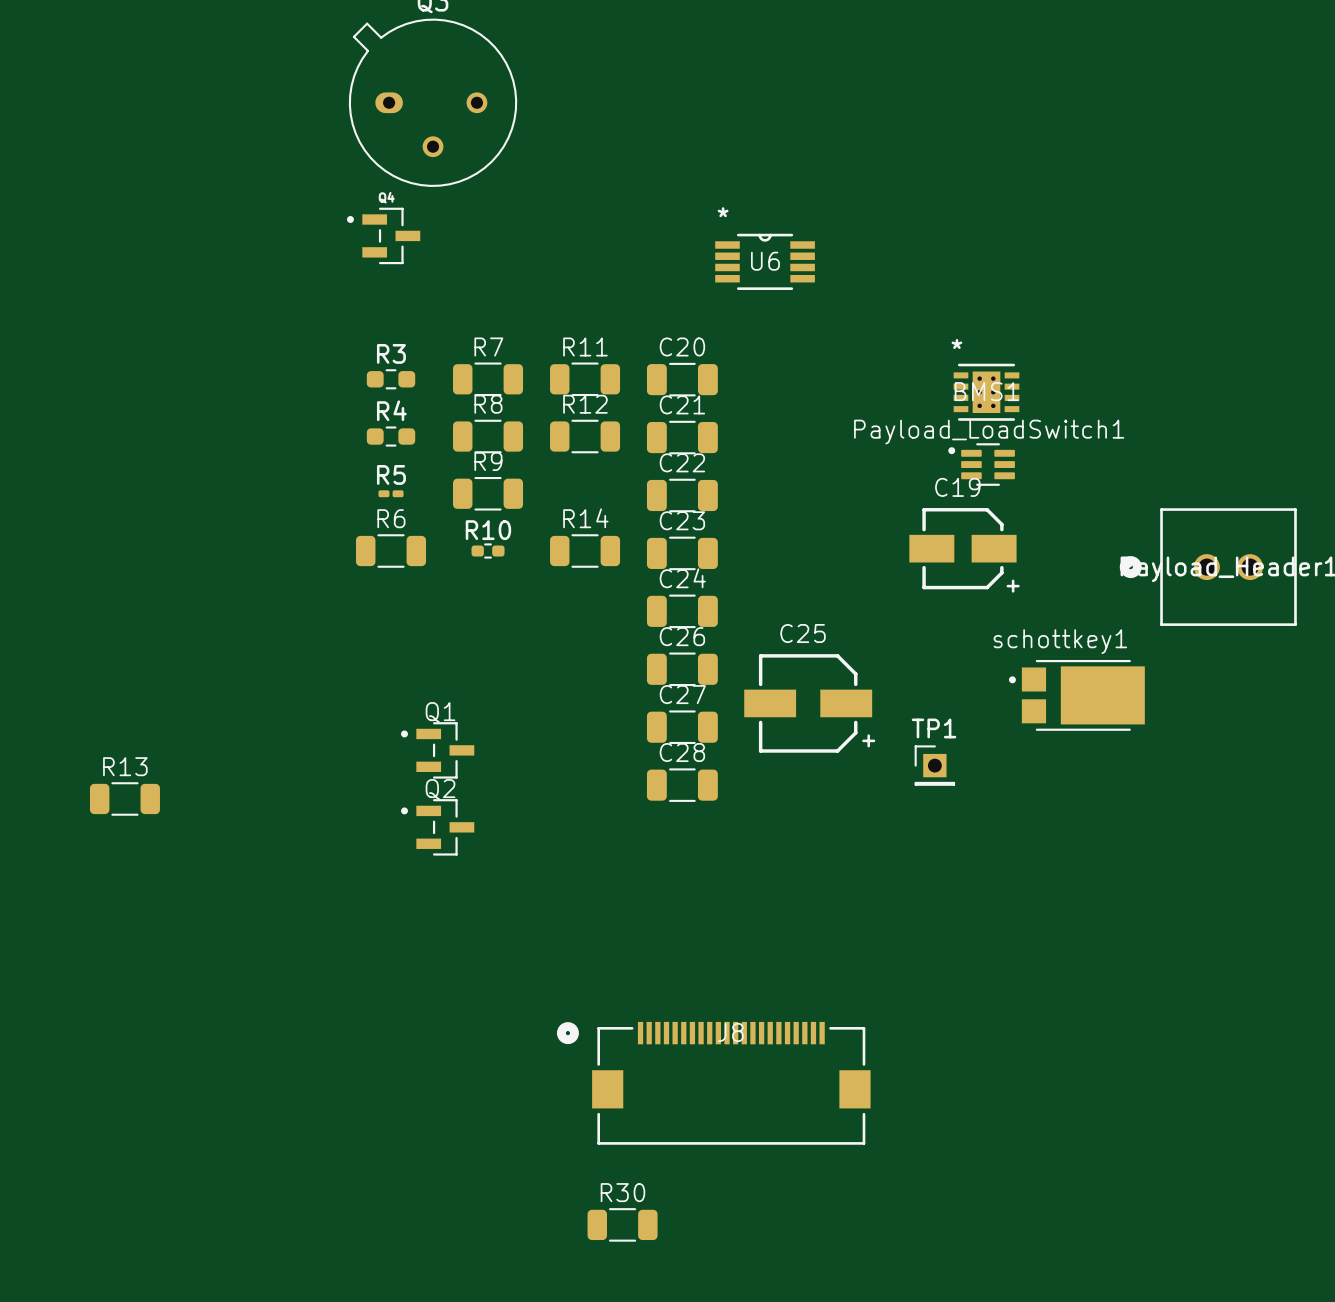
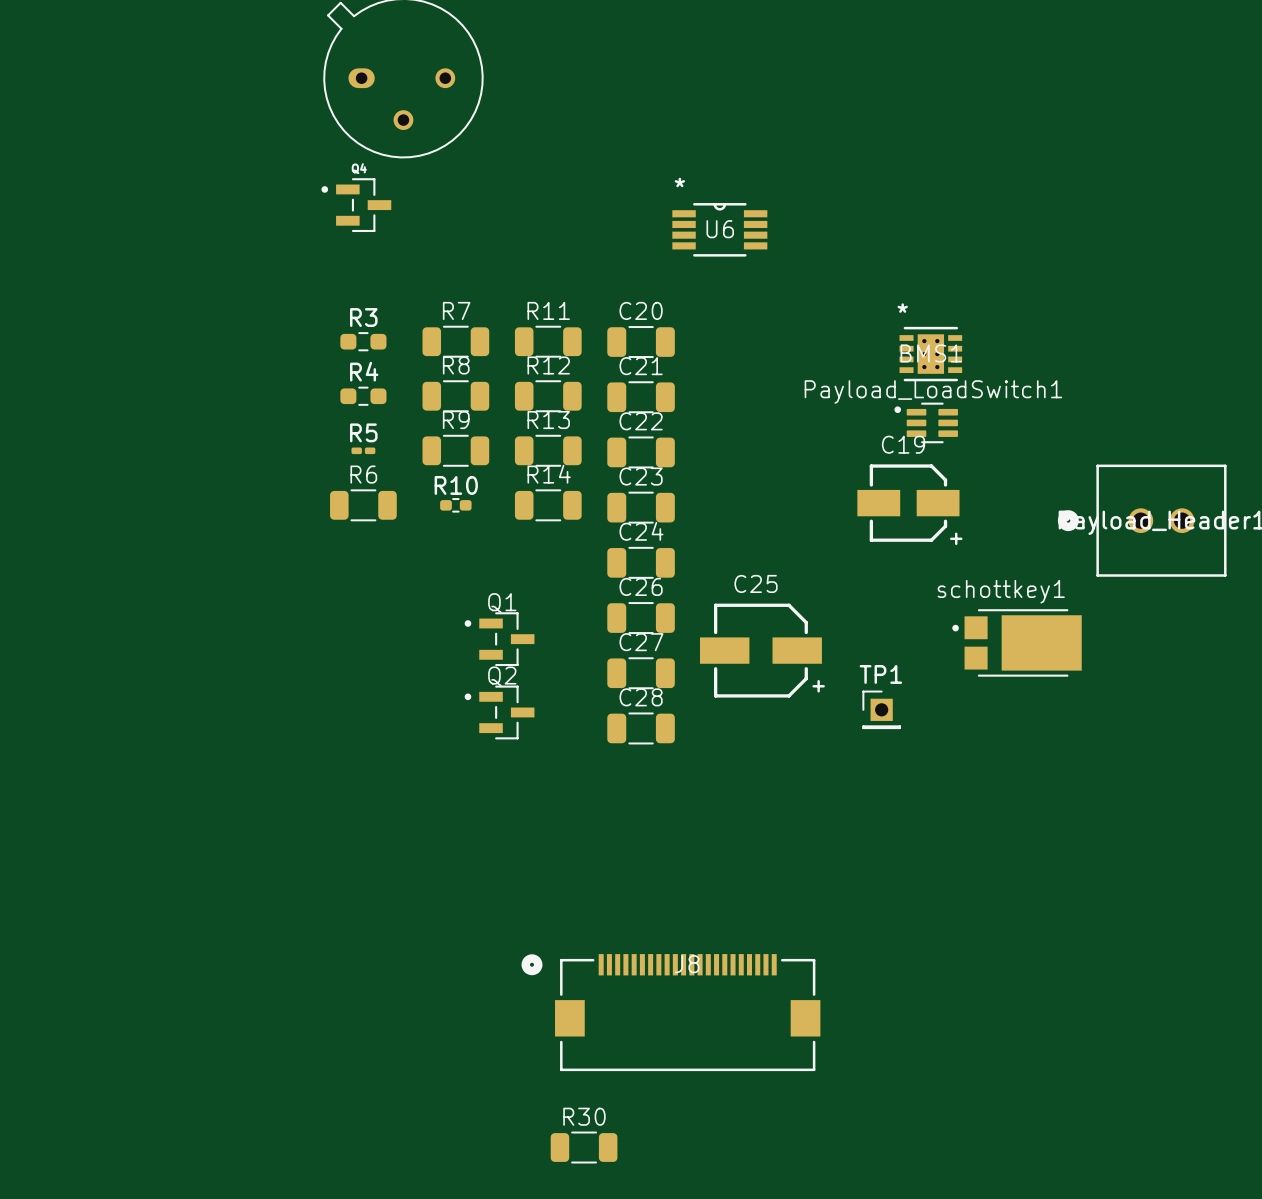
Q1 position: (437, 750) -> (499, 639)
R13 position: (124, 798) -> (548, 450)
Q2 position: (437, 827) -> (499, 712)

